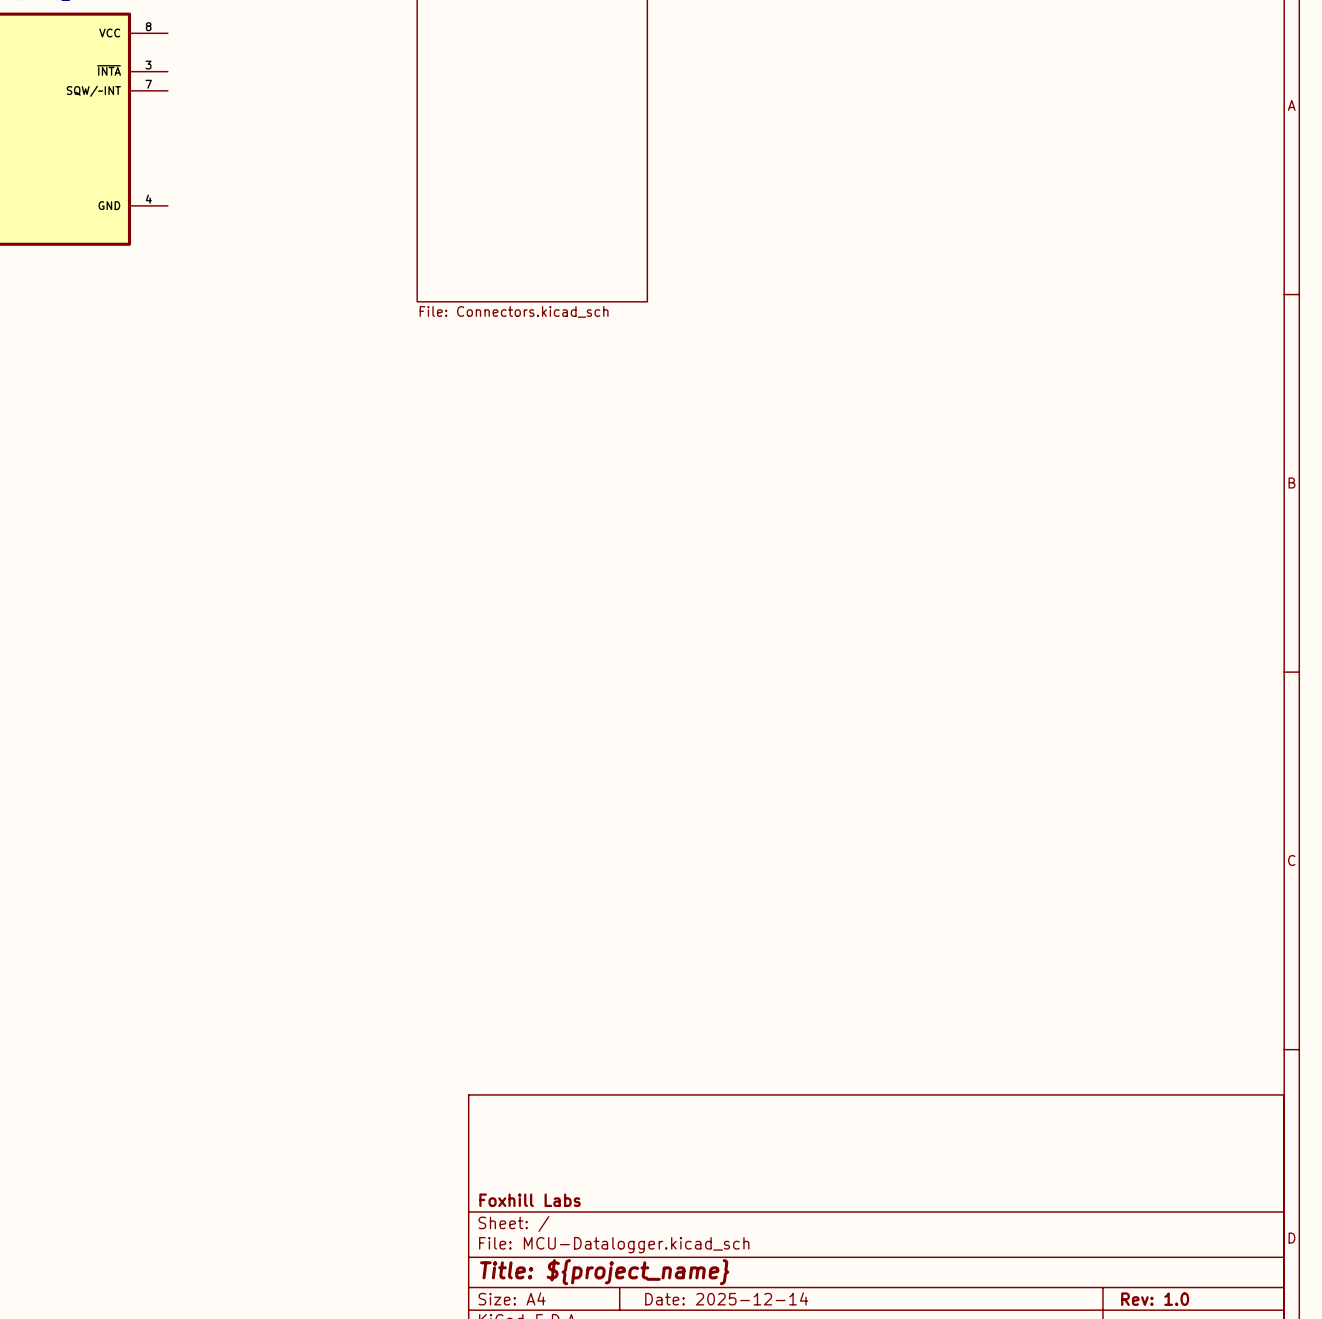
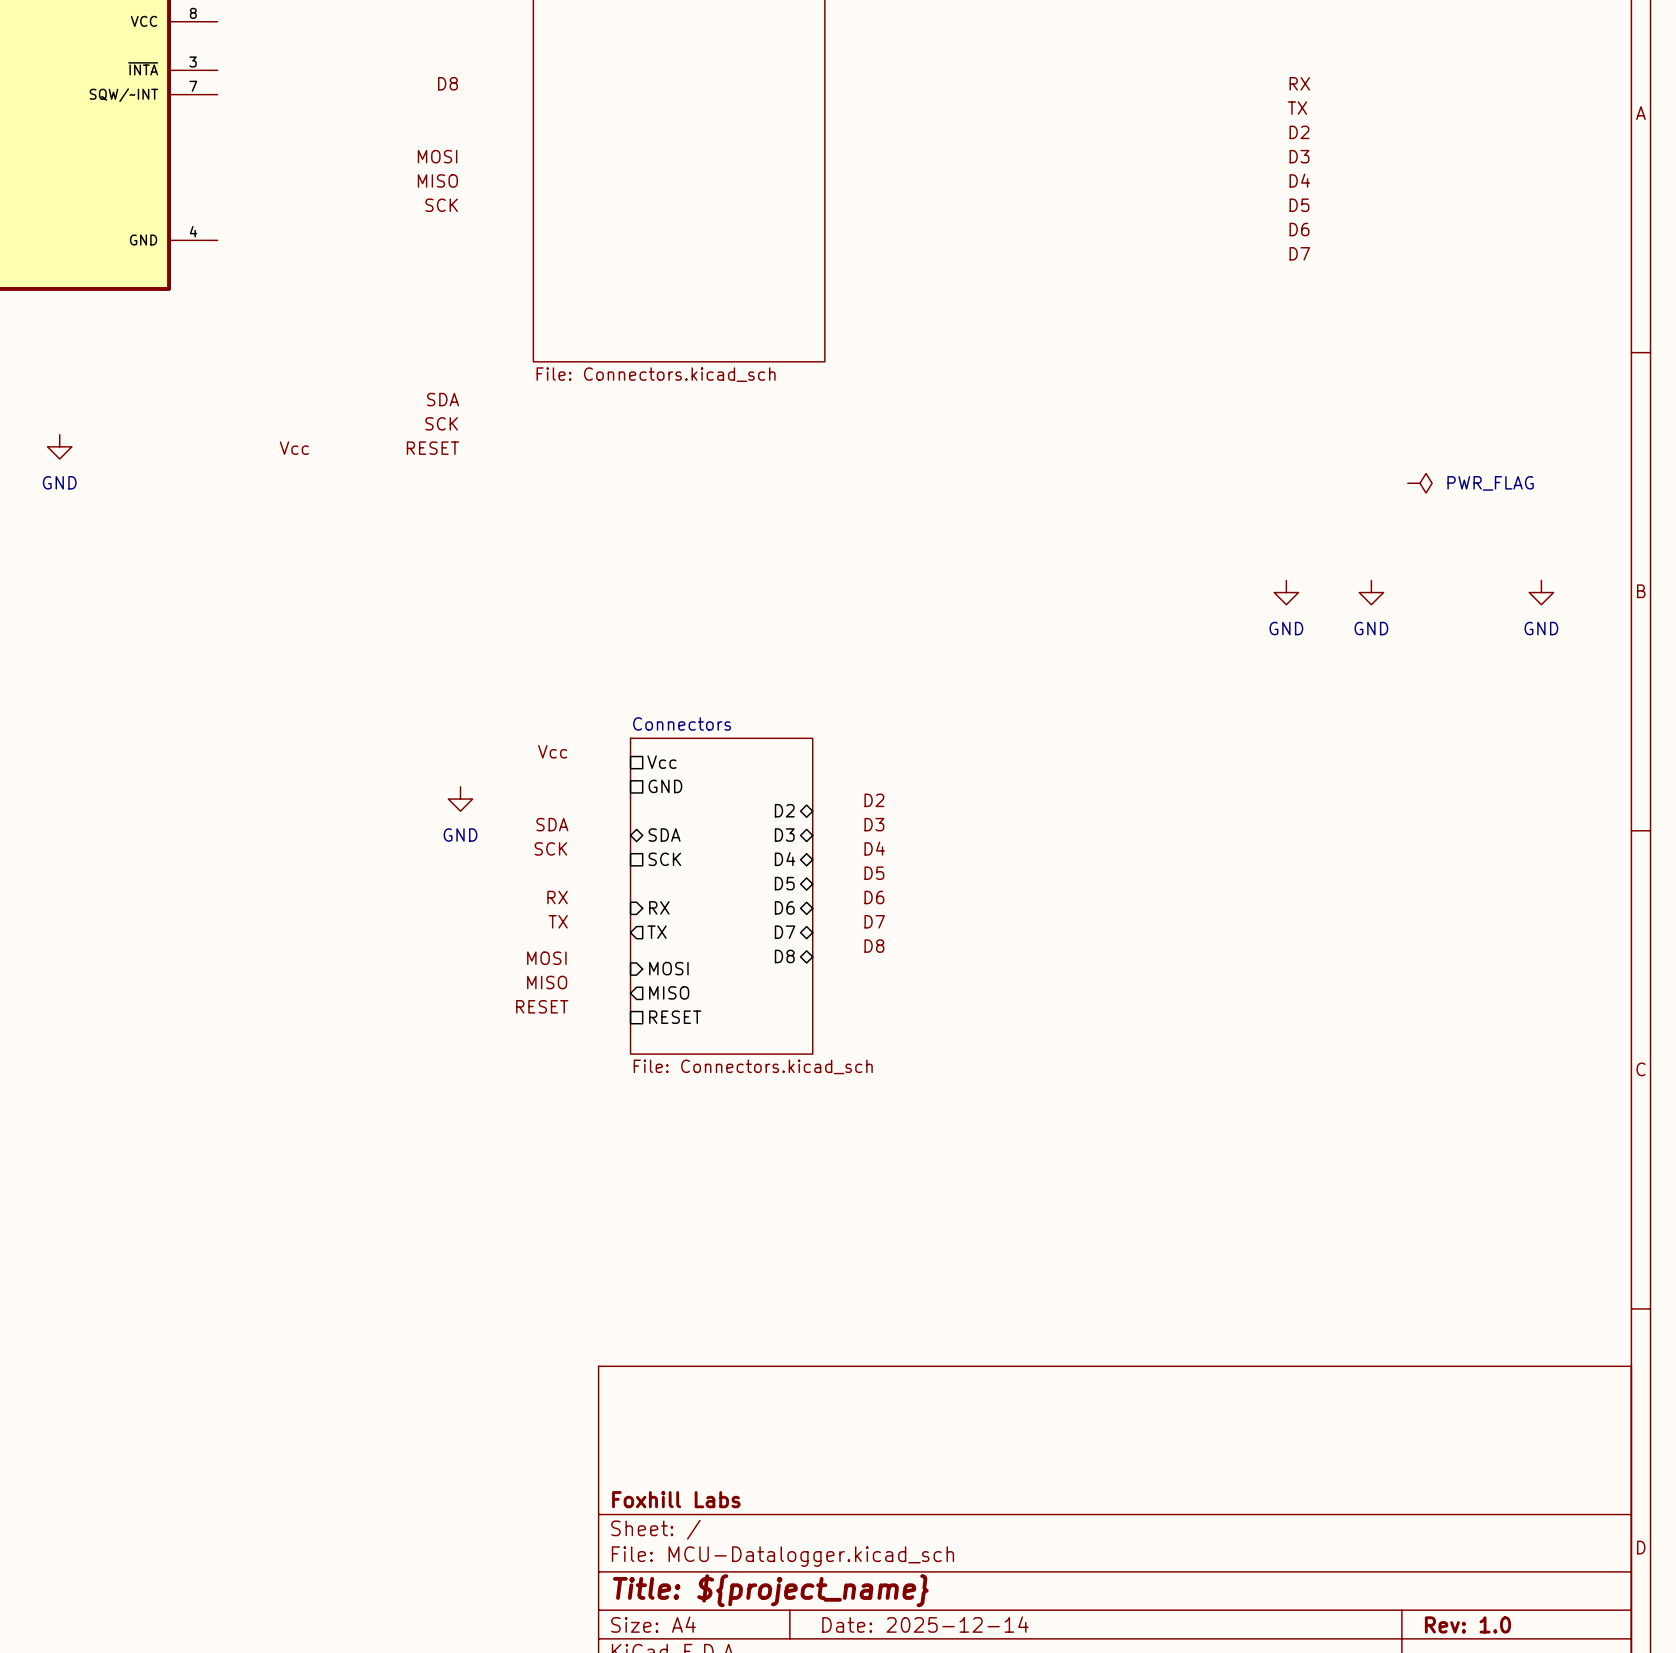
label: none -> D8 (447, 83)
label: none -> RX (1299, 83)
label: none -> TX (1297, 108)
label: none -> D2 (1299, 132)
label: none -> MOSI (437, 156)
label: none -> D3 (1299, 156)
label: none -> D4 (1299, 180)
label: none -> MISO (437, 180)
label: none -> SCK (441, 205)
label: none -> D5 (1299, 205)
label: none -> D6 (1299, 229)
label: none -> D7 (1299, 253)
label: none -> SDA (443, 399)
label: none -> SCK (441, 423)
power symbol: none -> GND (59, 446)
label: none -> Vcc (294, 448)
label: none -> RESET (432, 448)
power symbol: none -> PWR_FLAG (1419, 483)
power symbol: none -> GND (1286, 592)
power symbol: none -> GND (1371, 592)
power symbol: none -> GND (1541, 592)
label: none -> Vcc (552, 751)
sheet pin: none -> Vcc (661, 762)
sheet pin: none -> GND (665, 786)
power symbol: none -> GND (460, 799)
label: none -> D2 (874, 800)
sheet pin: none -> D2 (784, 810)
label: none -> SDA (552, 824)
label: none -> D3 (874, 824)
sheet pin: none -> SDA (664, 835)
sheet pin: none -> D3 (784, 835)
label: none -> SCK (550, 848)
label: none -> D4 (874, 848)
sheet pin: none -> SCK (664, 859)
sheet pin: none -> D4 (785, 859)
label: none -> D5 (874, 873)
sheet pin: none -> D5 (784, 883)
sheet Connectors: none -> File: Connectors.kicad_sch (721, 896)
label: none -> RX (557, 897)
label: none -> D6 (874, 897)
sheet pin: none -> RX (659, 907)
sheet pin: none -> D6 (784, 907)
label: none -> TX (558, 921)
label: none -> D7 (874, 921)
sheet pin: none -> TX (657, 932)
sheet pin: none -> D7 (785, 932)
label: none -> D8 (874, 946)
sheet pin: none -> D8 (784, 956)
label: none -> MOSI (546, 958)
sheet pin: none -> MOSI (668, 968)
label: none -> MISO (547, 982)
sheet pin: none -> MISO (669, 992)
label: none -> RESET (542, 1006)
sheet pin: none -> RESET (675, 1017)

